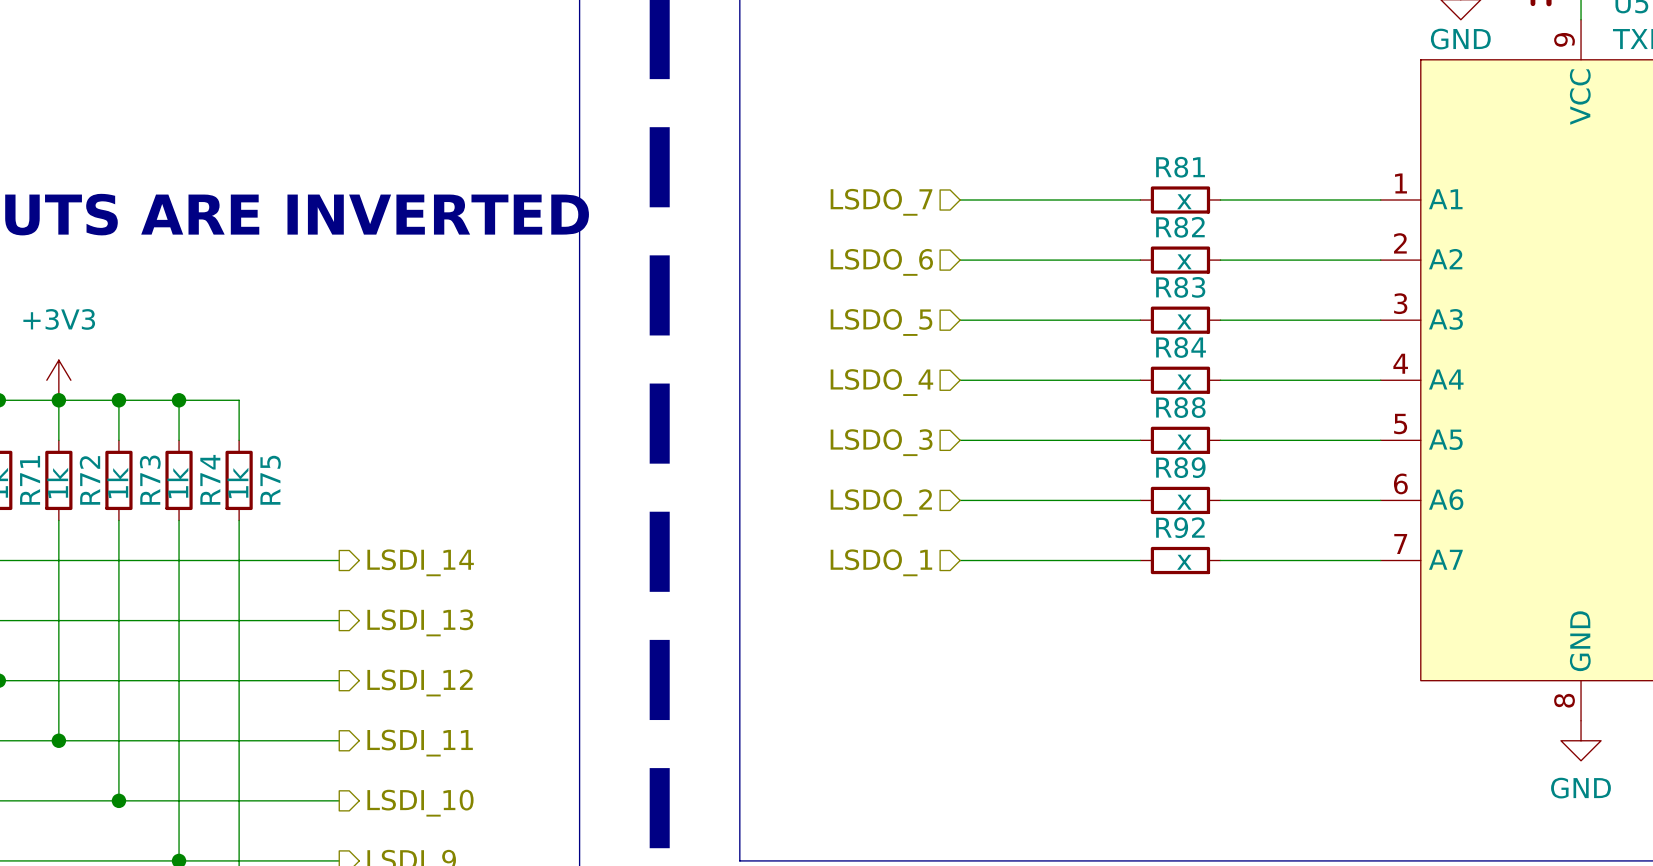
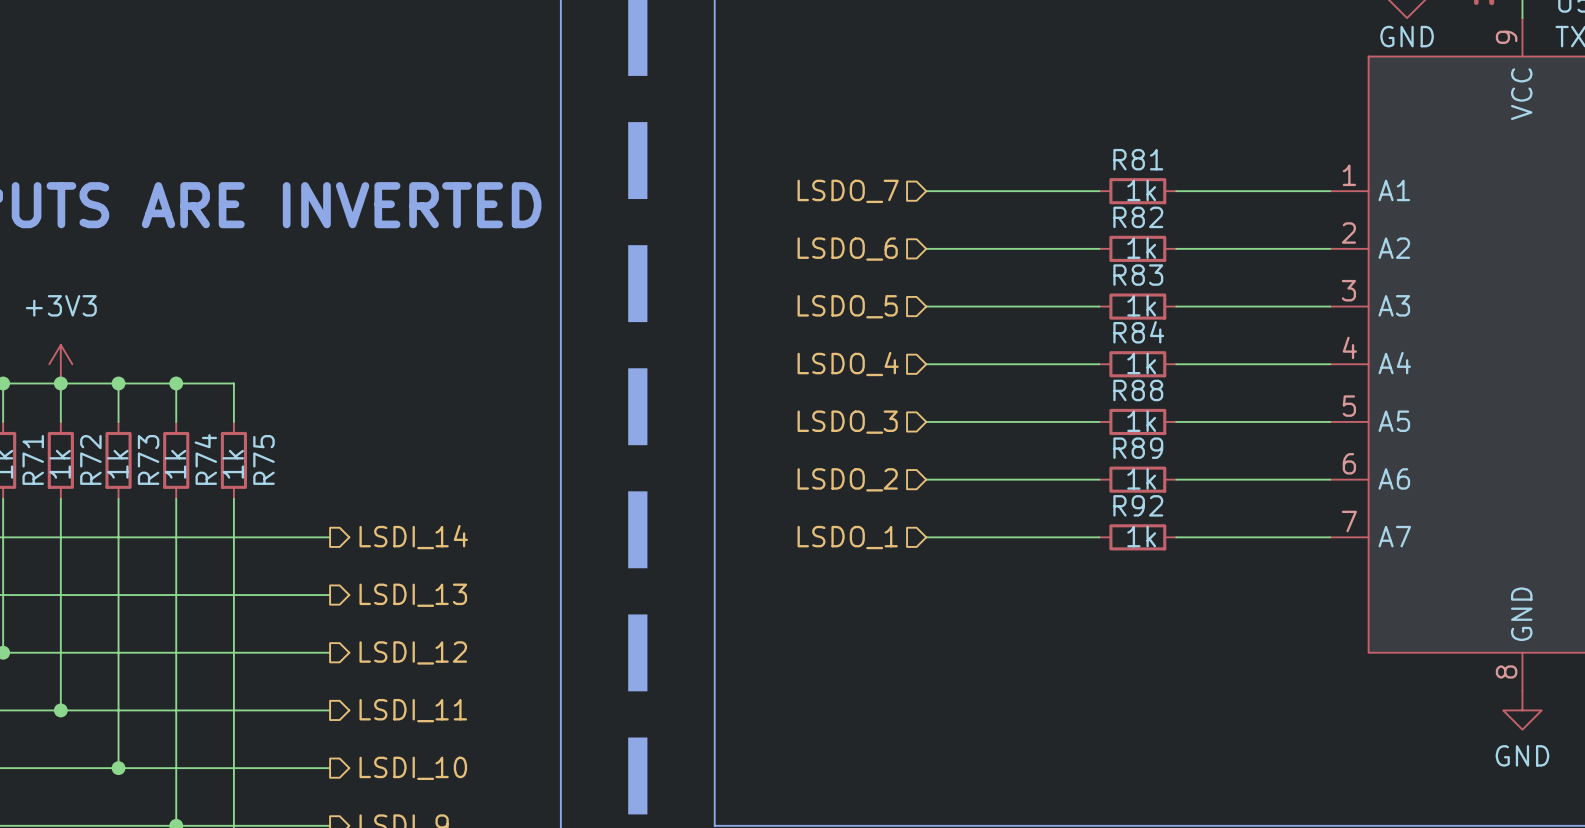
R81 value: x (1184, 201) -> 1k (1141, 190)
R82 value: x (1184, 261) -> 1k (1141, 248)
R83 value: x (1184, 321) -> 1k (1141, 305)
R84 value: x (1184, 382) -> 1k (1141, 363)
R88 value: x (1184, 442) -> 1k (1141, 421)
R89 value: x (1184, 502) -> 1k (1141, 478)
R92 value: x (1184, 562) -> 1k (1141, 536)

